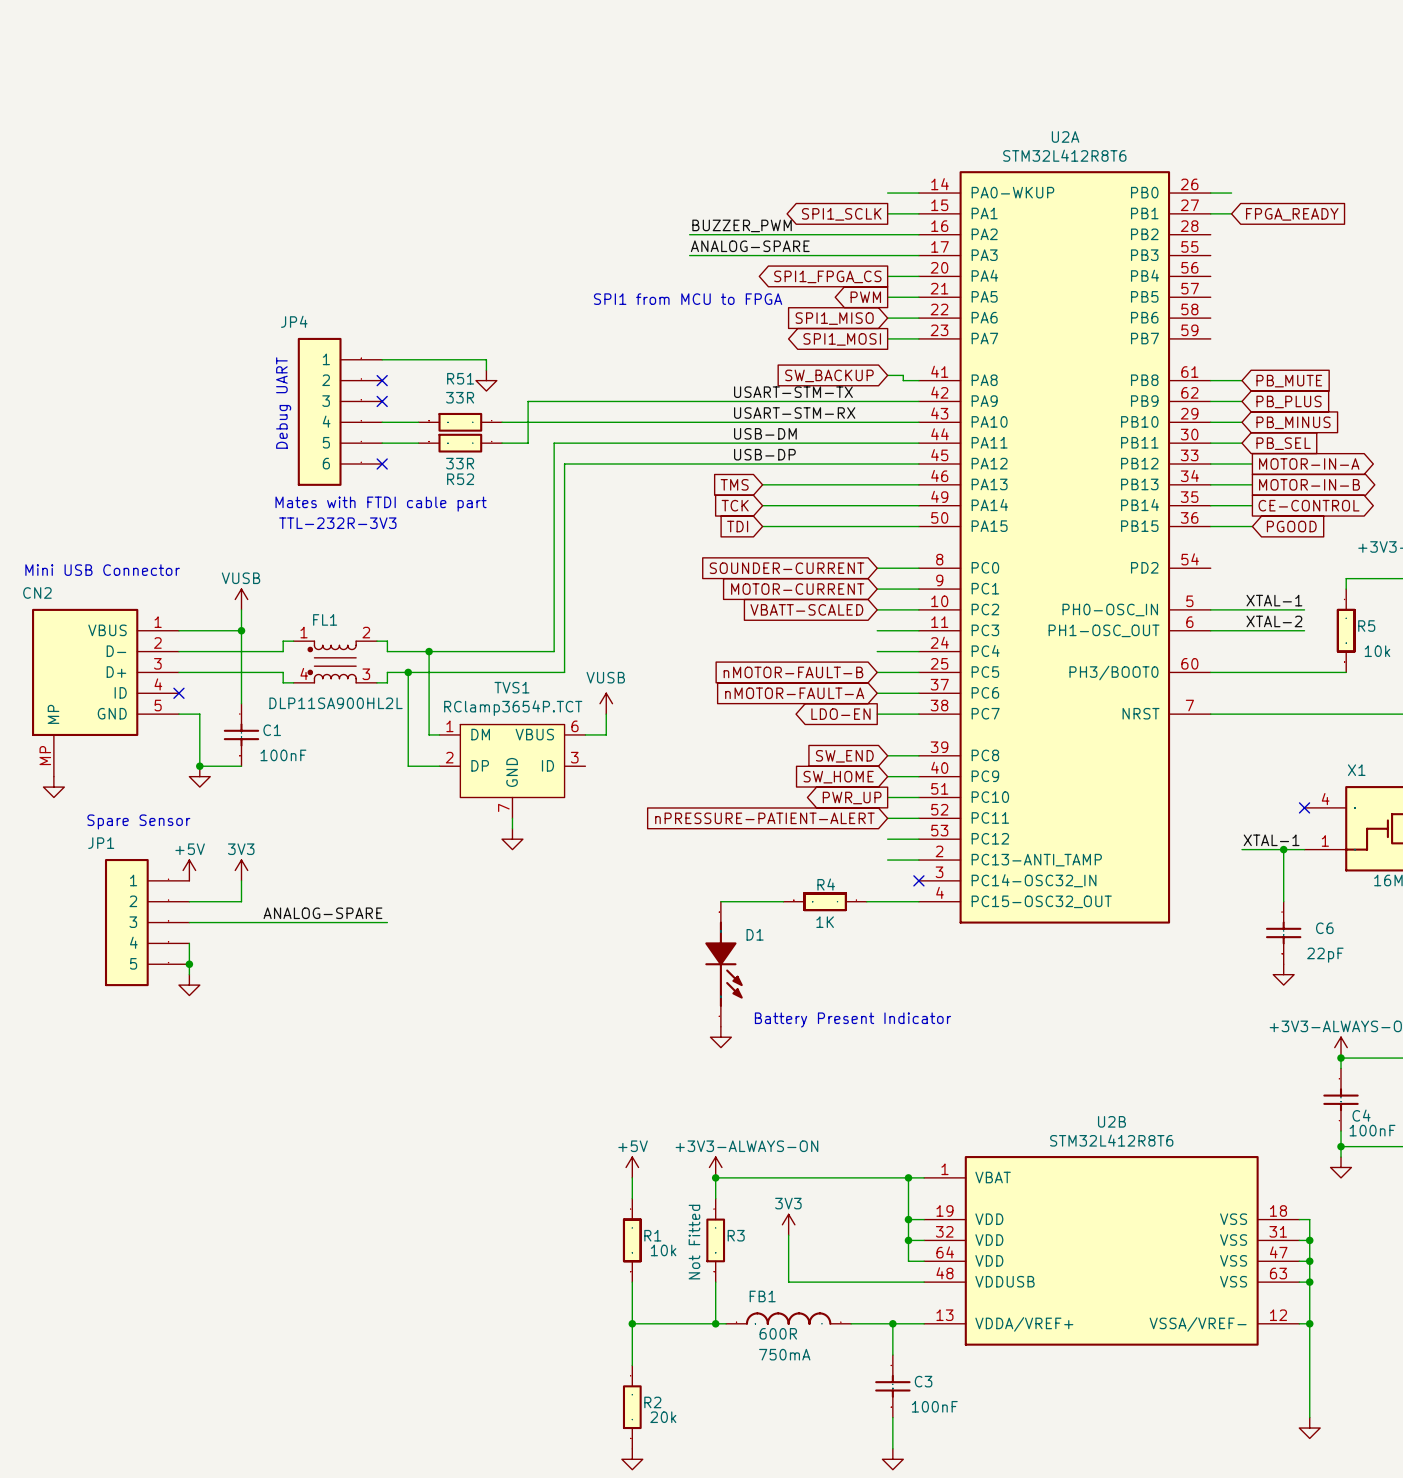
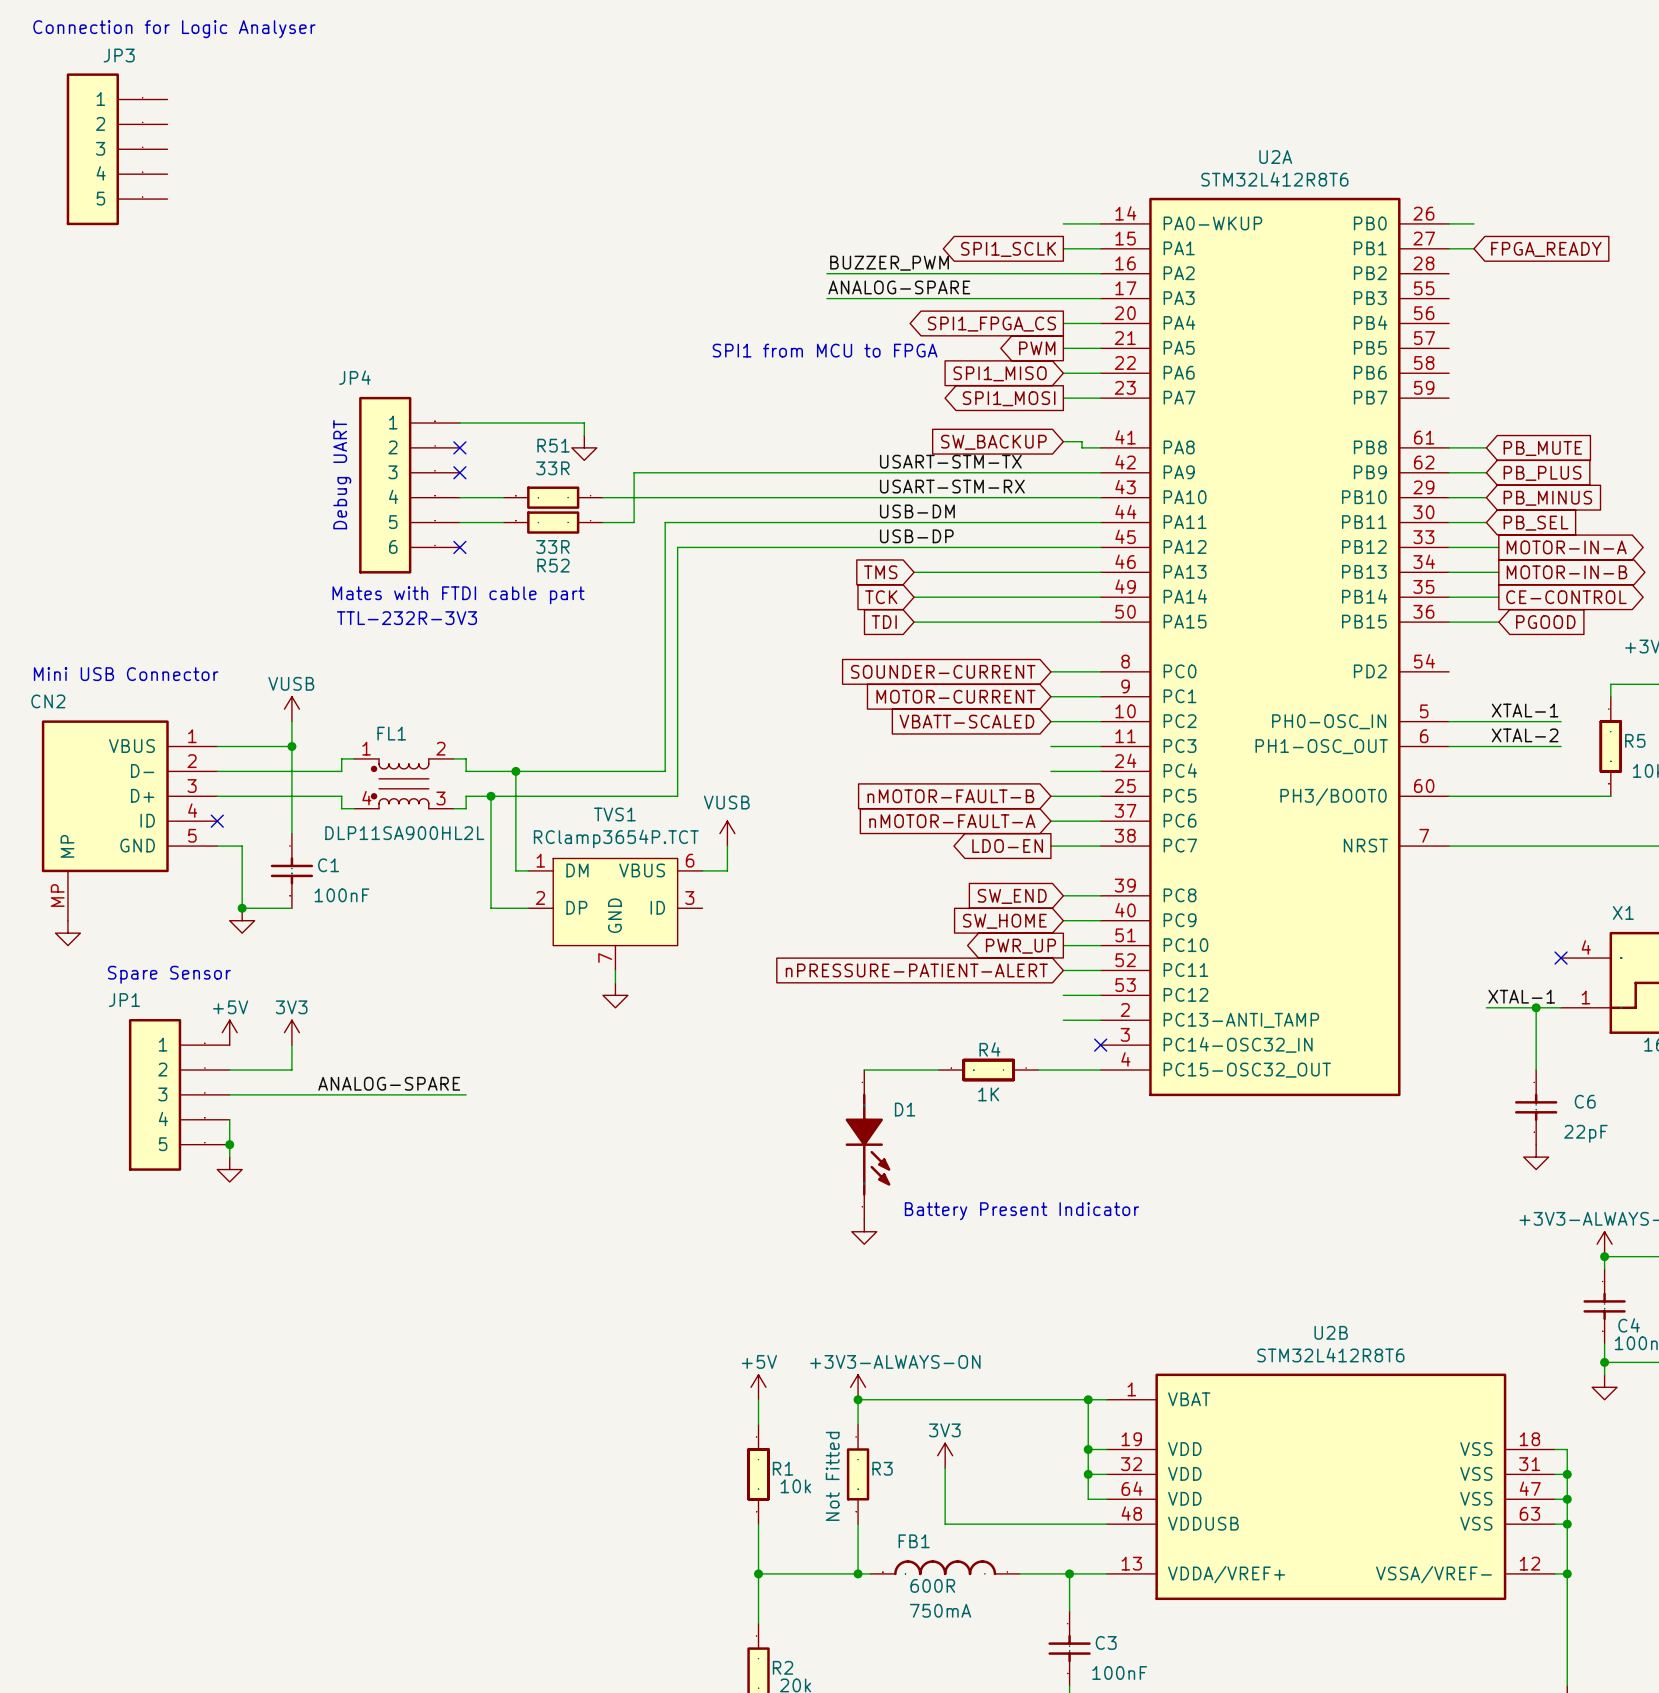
text: none -> Connection for Logic Analyser (174, 29)
JP3: none -> (117, 149)

